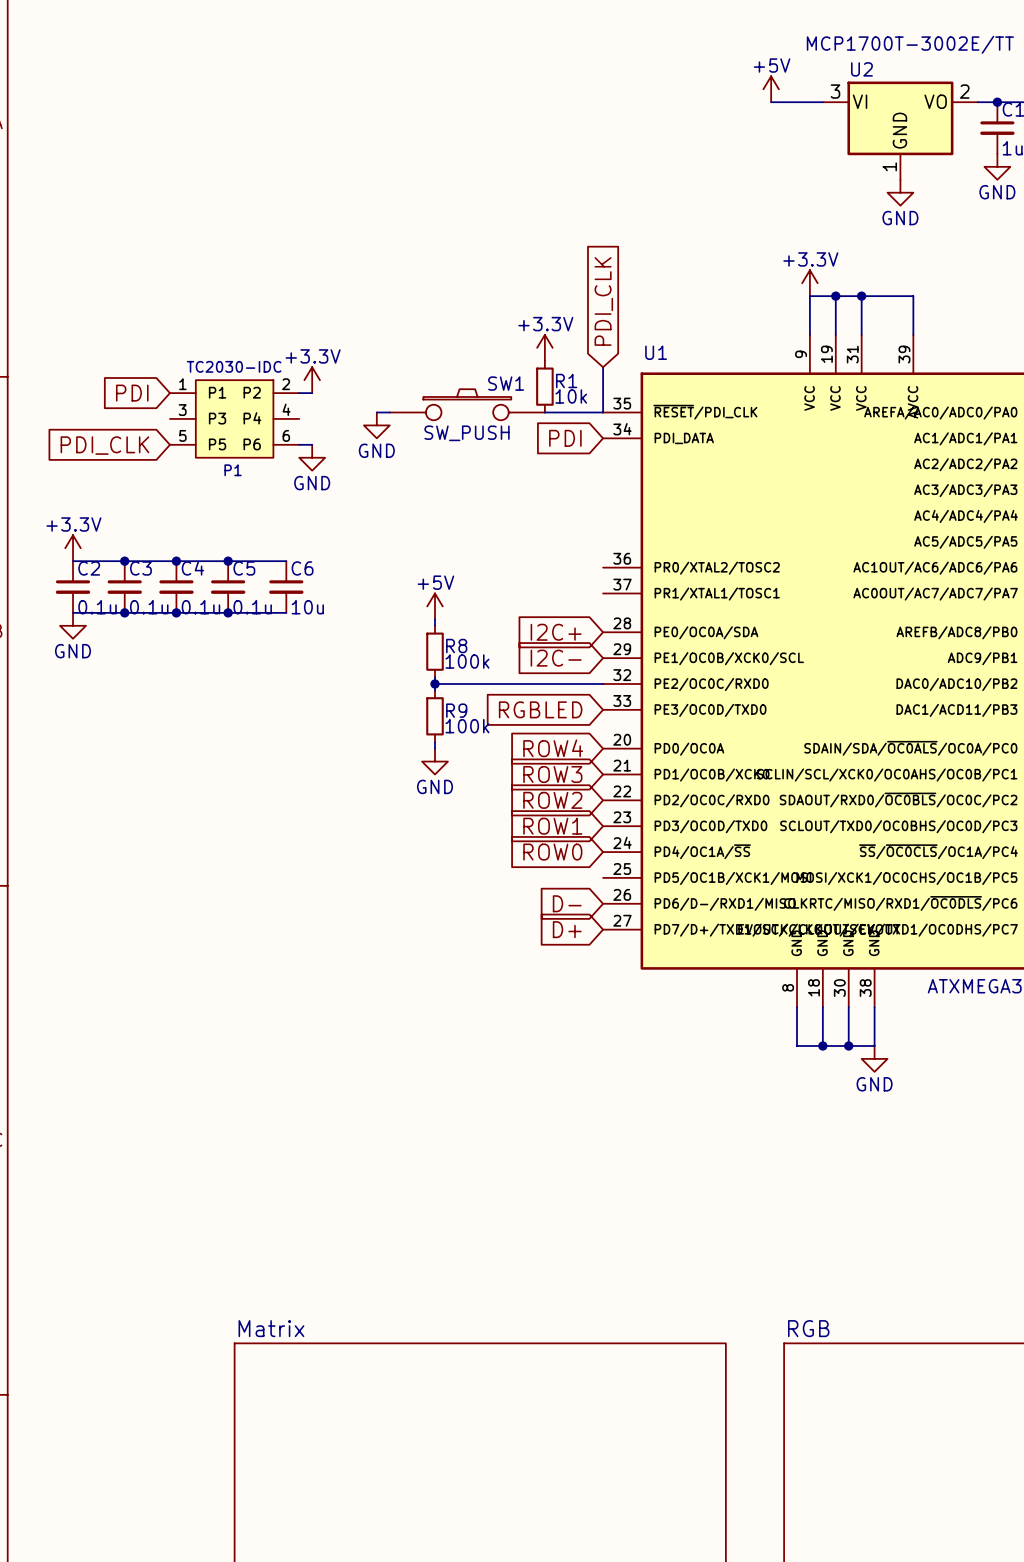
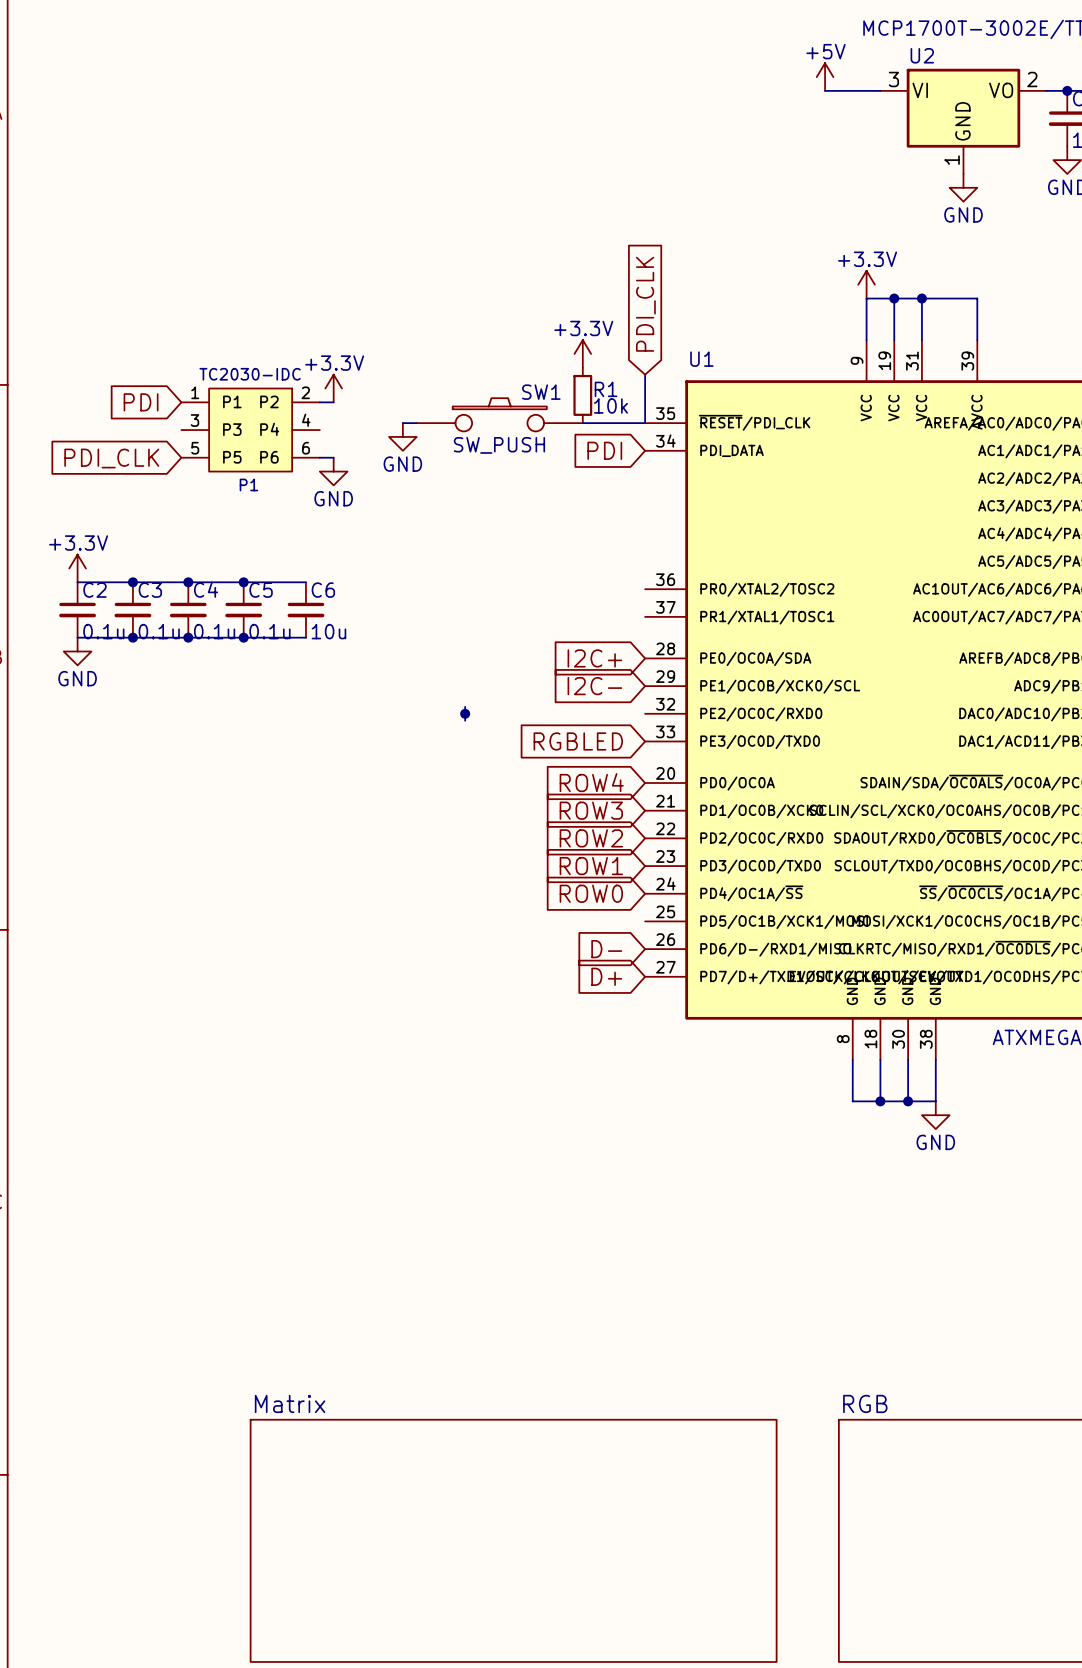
power symbol: +5V (435, 606) -> none
wire: (435, 619) (435, 625) -> none
R8: 100k (435, 651) -> none
wire: (435, 683) (603, 683) -> none
R9: 100k (435, 716) -> none
wire: (435, 742) (435, 748) -> none
power symbol: GND (435, 761) -> none

